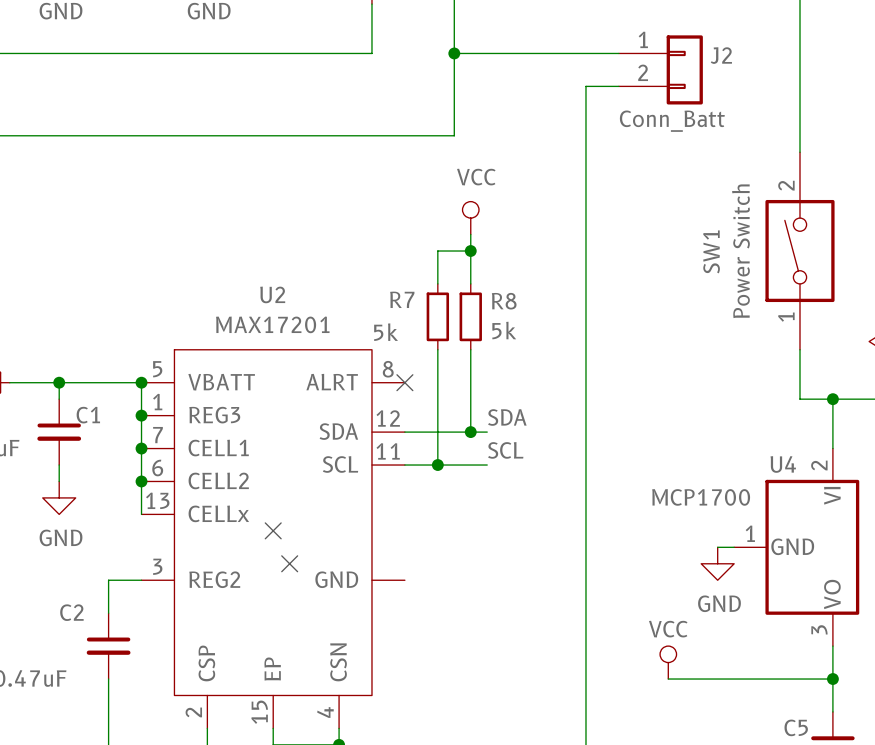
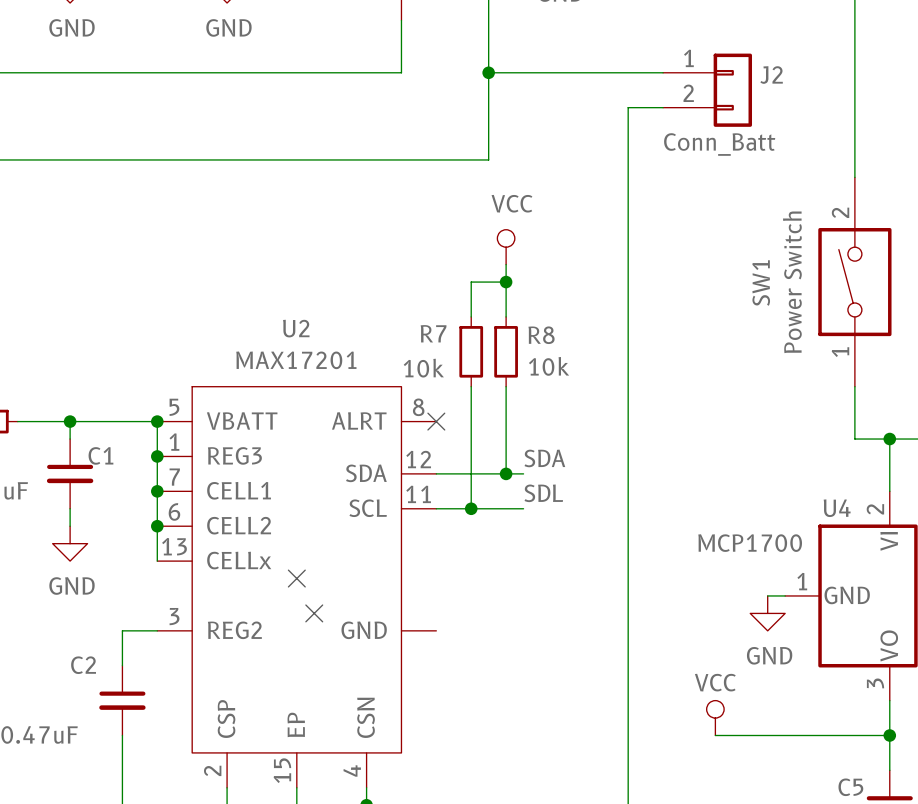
R8 value: 5k (504, 330) -> 10k (549, 366)
R7 value: 5k (386, 332) -> 10k (423, 368)
label: SCL (505, 450) -> SDL (543, 493)

